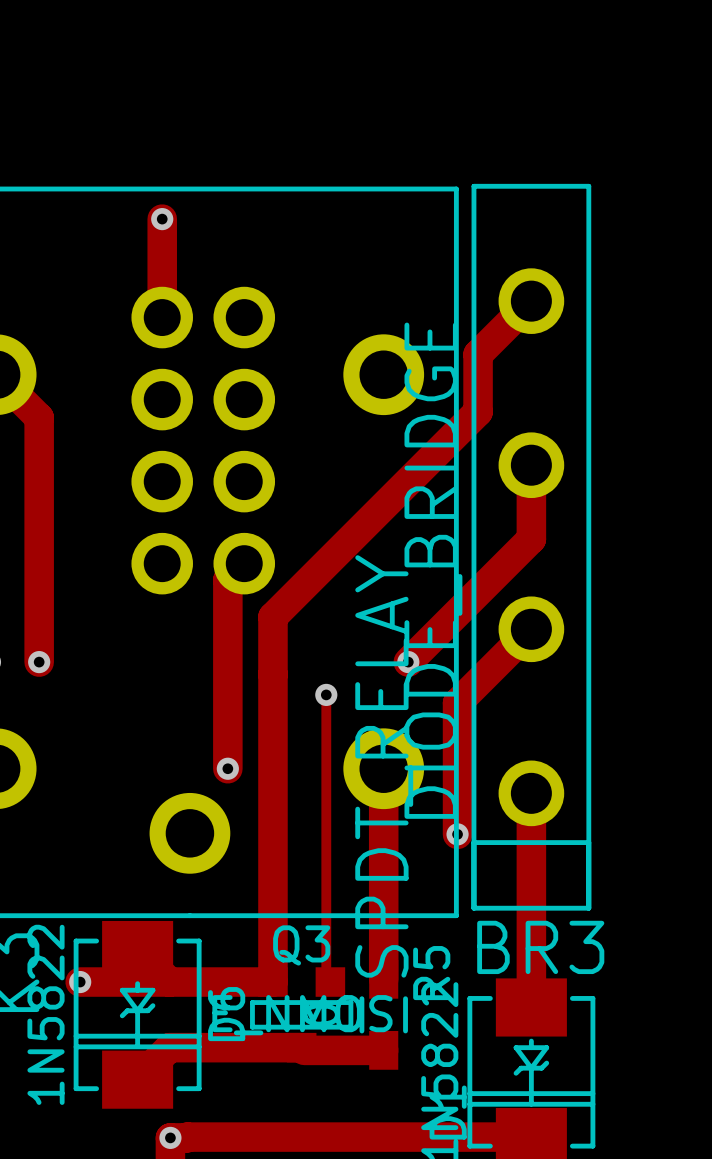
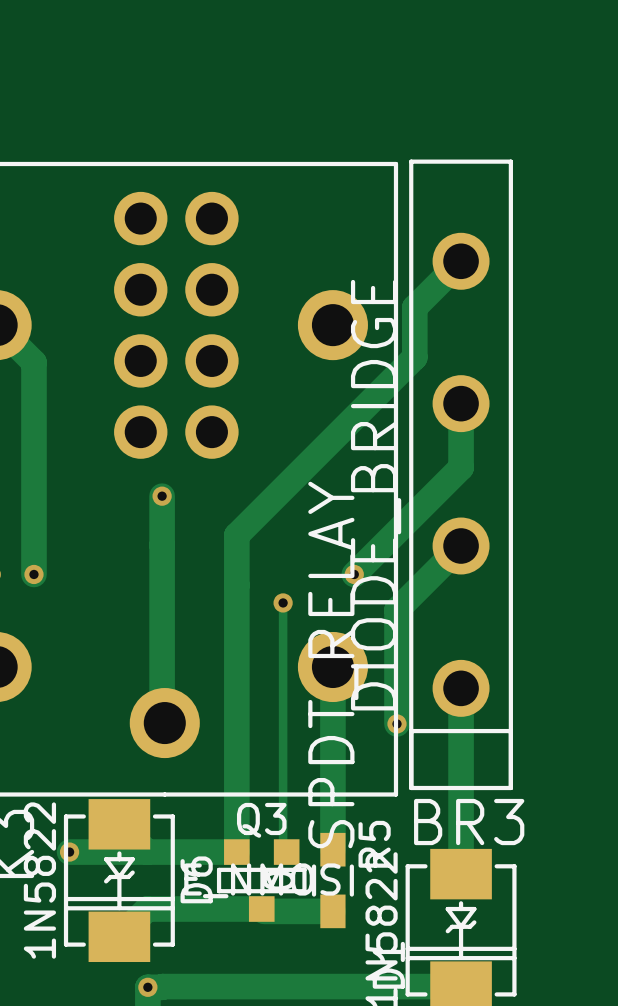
track: (162, 219) (162, 317) -> none
via: (162, 219) -> none
part position: (203, 440) -> (176, 325)
track: (244, 563) (227, 580) (227, 768) -> none
track: none -> (162, 496) (162, 720)
via: none -> (162, 496)
via: (227, 768) -> none

